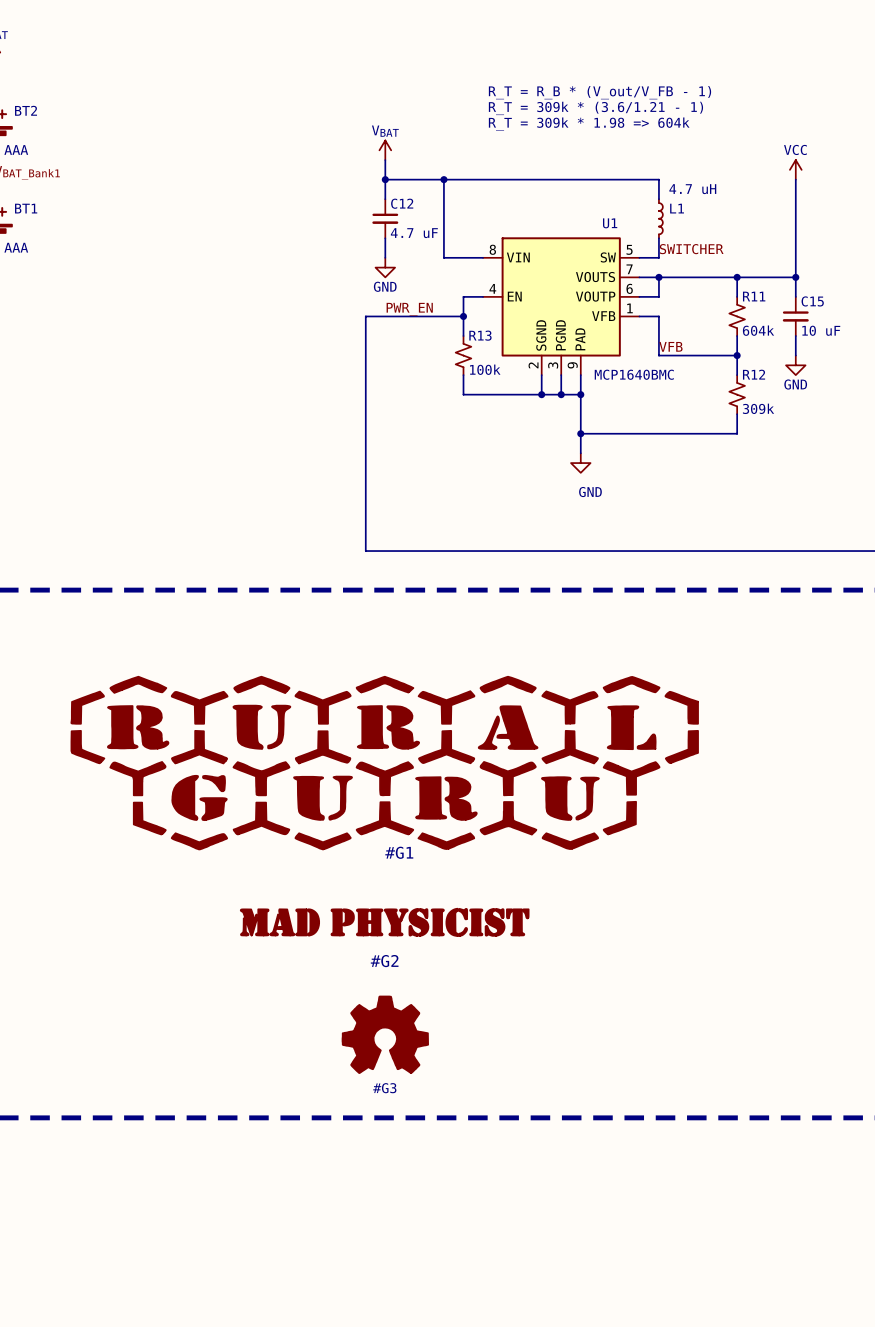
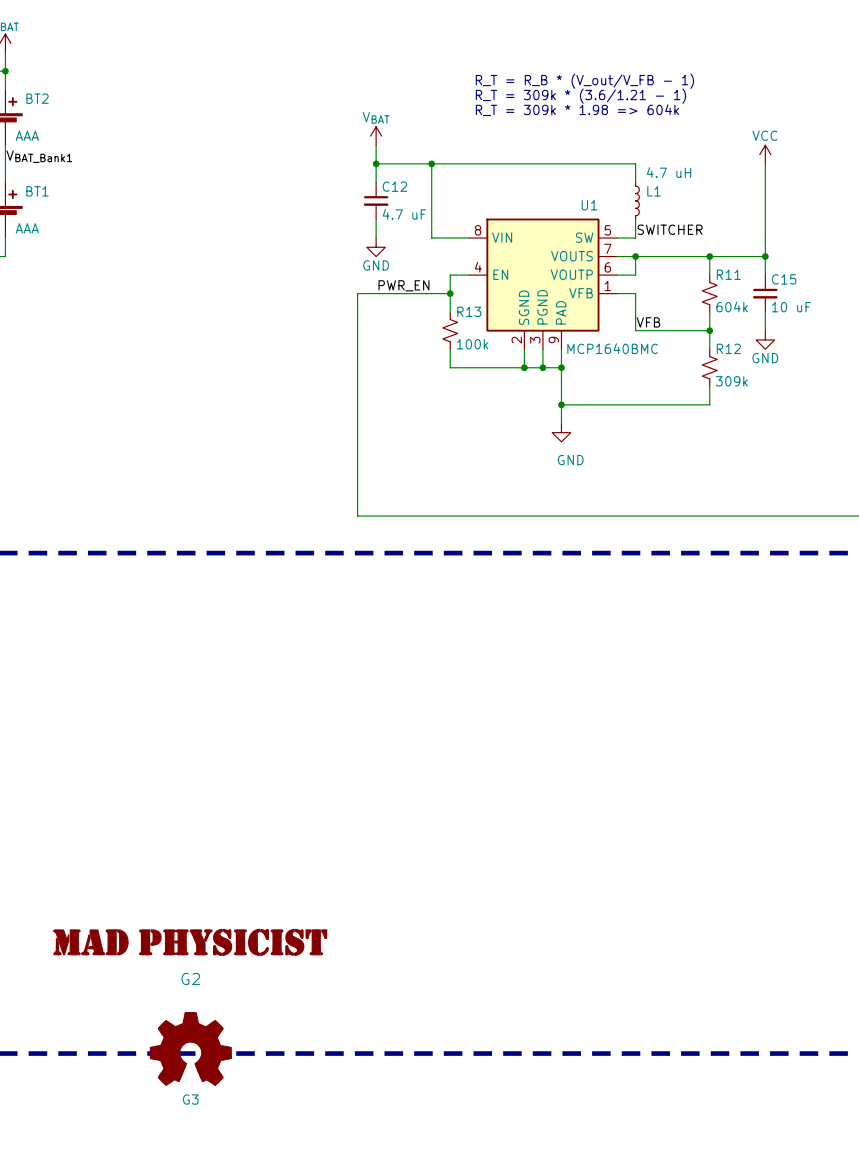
drawing: [71, 676, 699, 850] -> none
drawing: [240, 908, 529, 937] -> none
G2: none -> (190, 942)
#G3: (385, 1034) -> none
G3: none -> (190, 1048)

